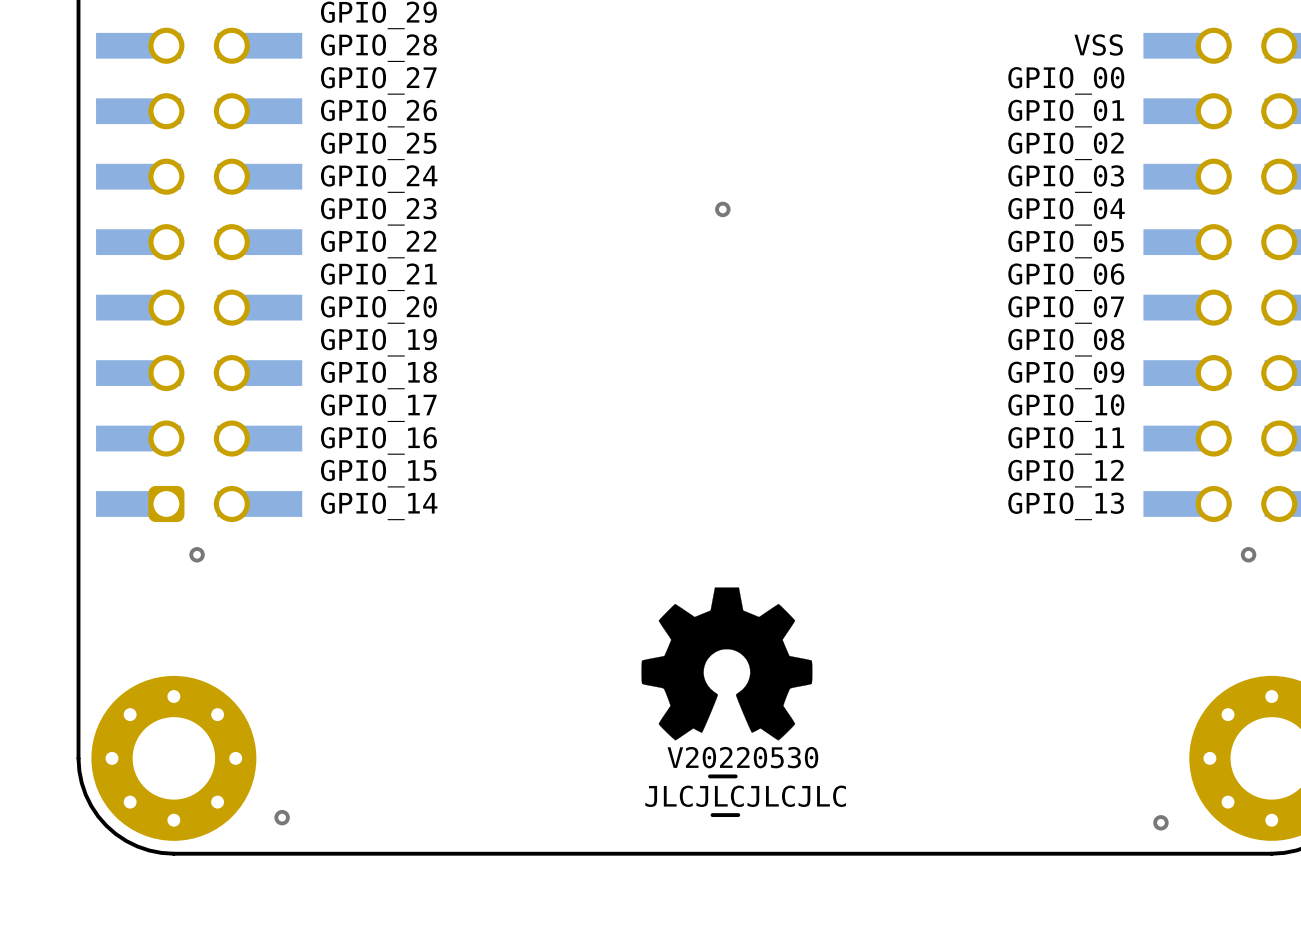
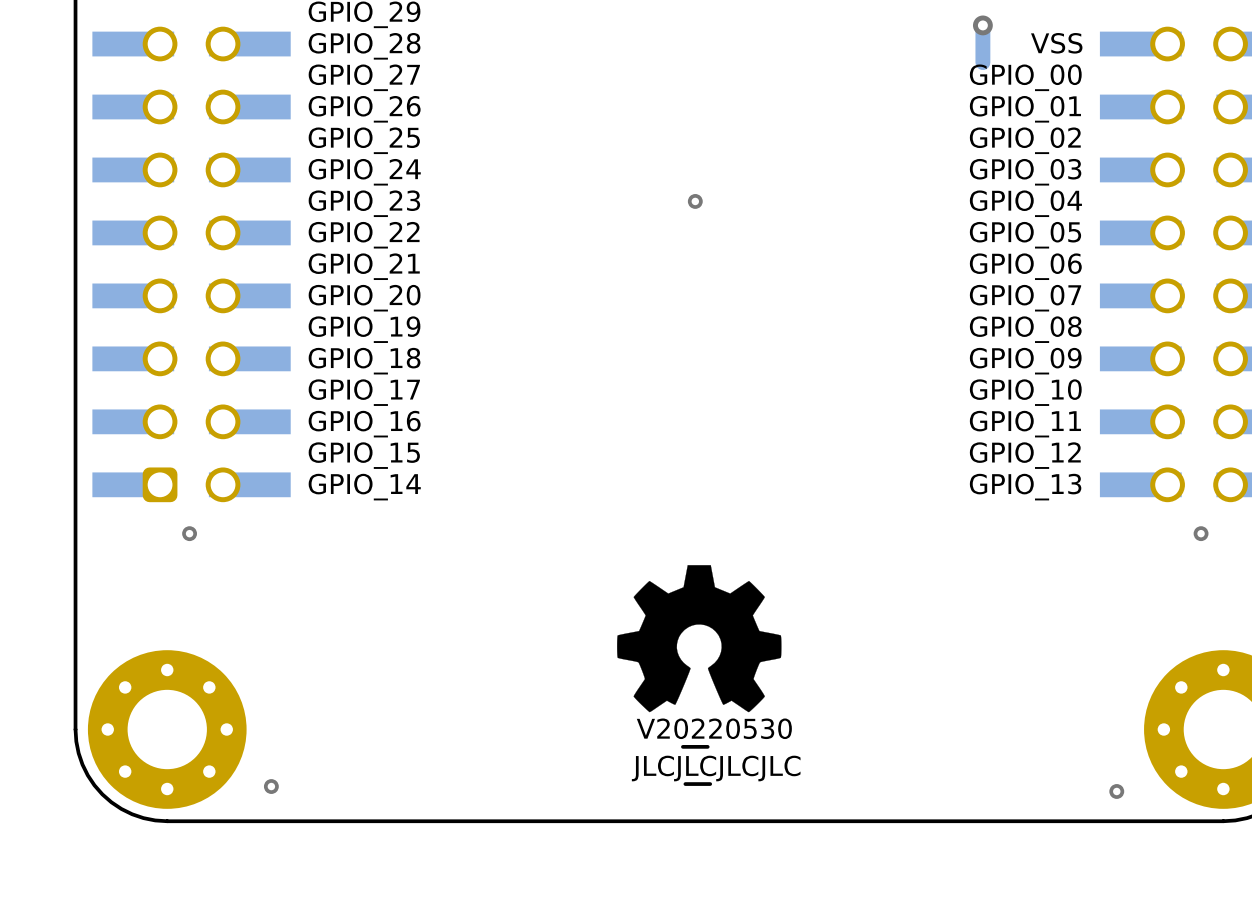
track: none -> (982, 25) (982, 62)
via: none -> (982, 25)

